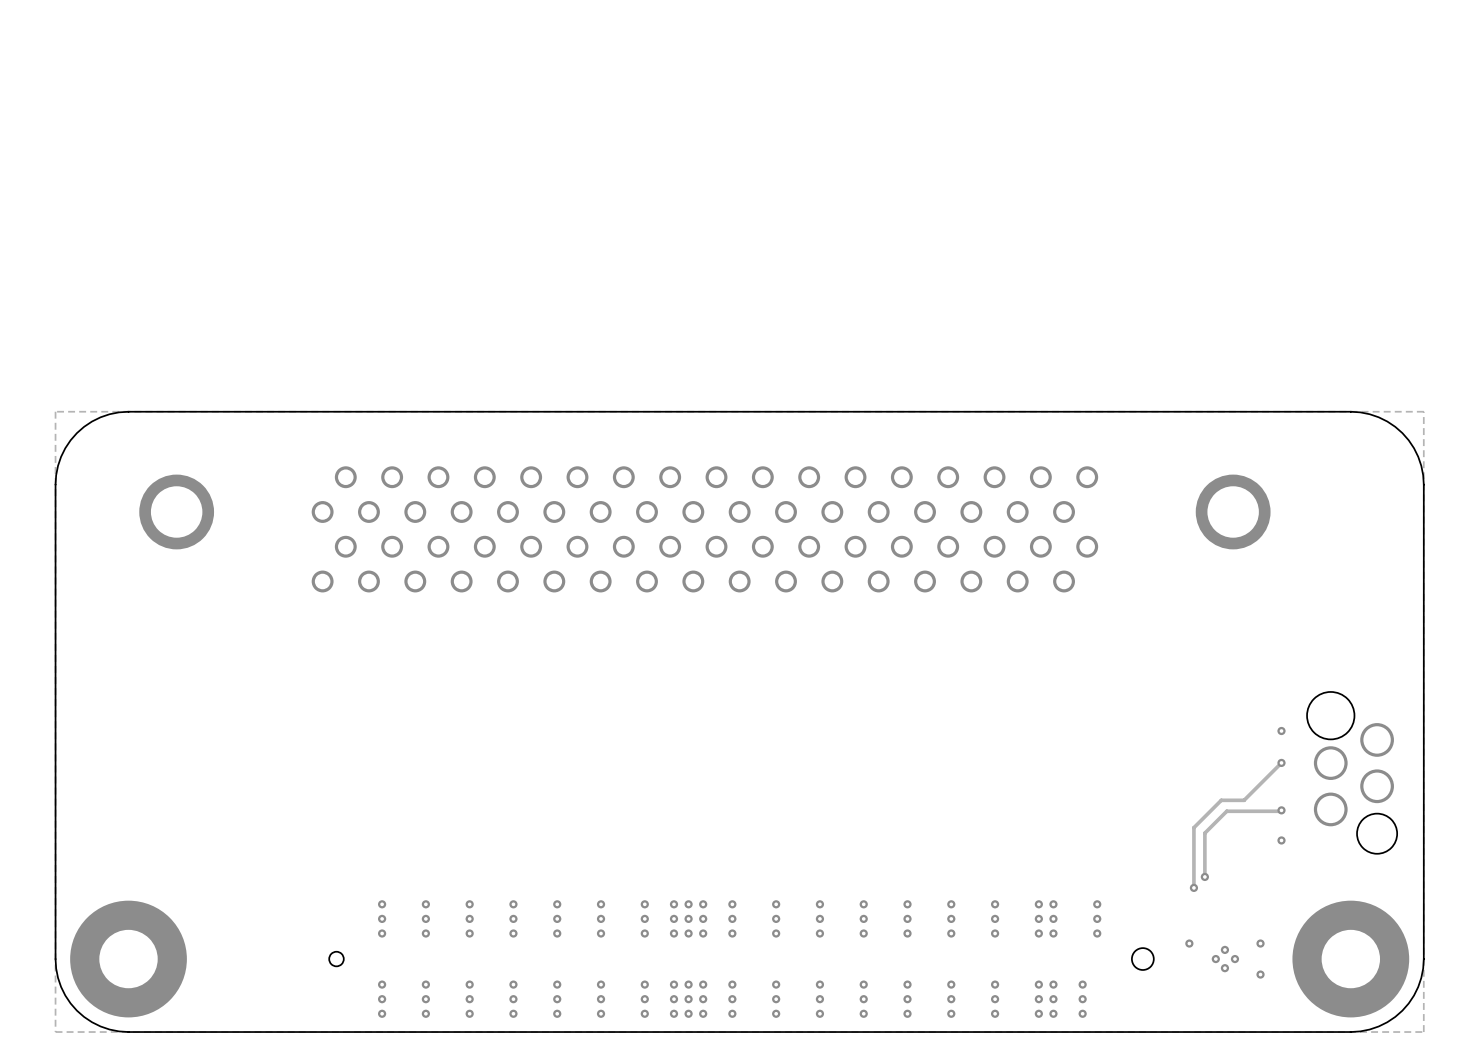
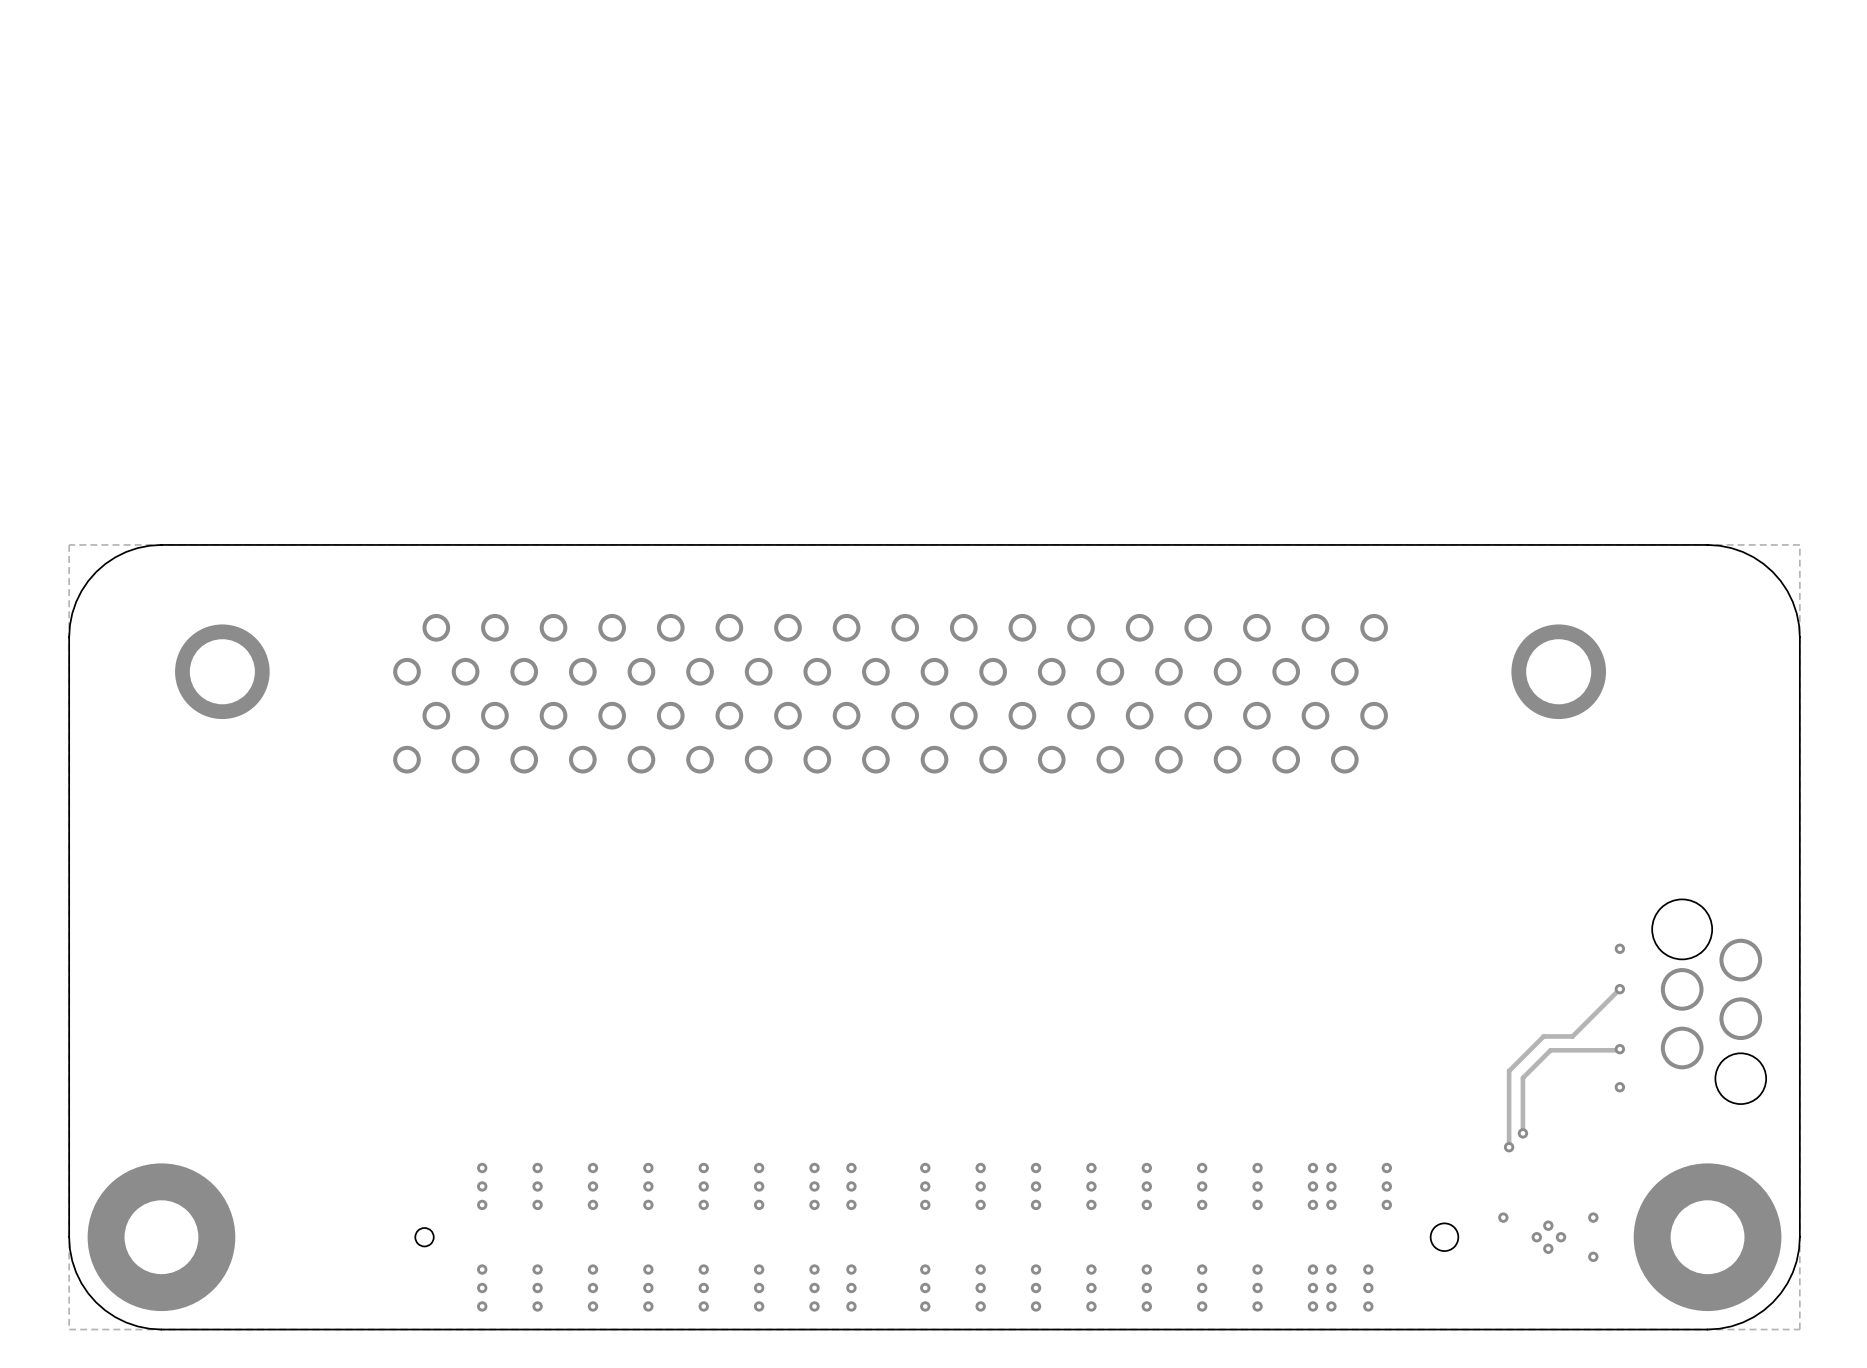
via: (688, 904) -> none
via: (703, 904) -> none
via: (688, 918) -> none
via: (703, 918) -> none
via: (688, 933) -> none
via: (703, 933) -> none
via: (688, 984) -> none
via: (703, 984) -> none
via: (688, 999) -> none
via: (703, 999) -> none
via: (688, 1013) -> none
via: (703, 1013) -> none

